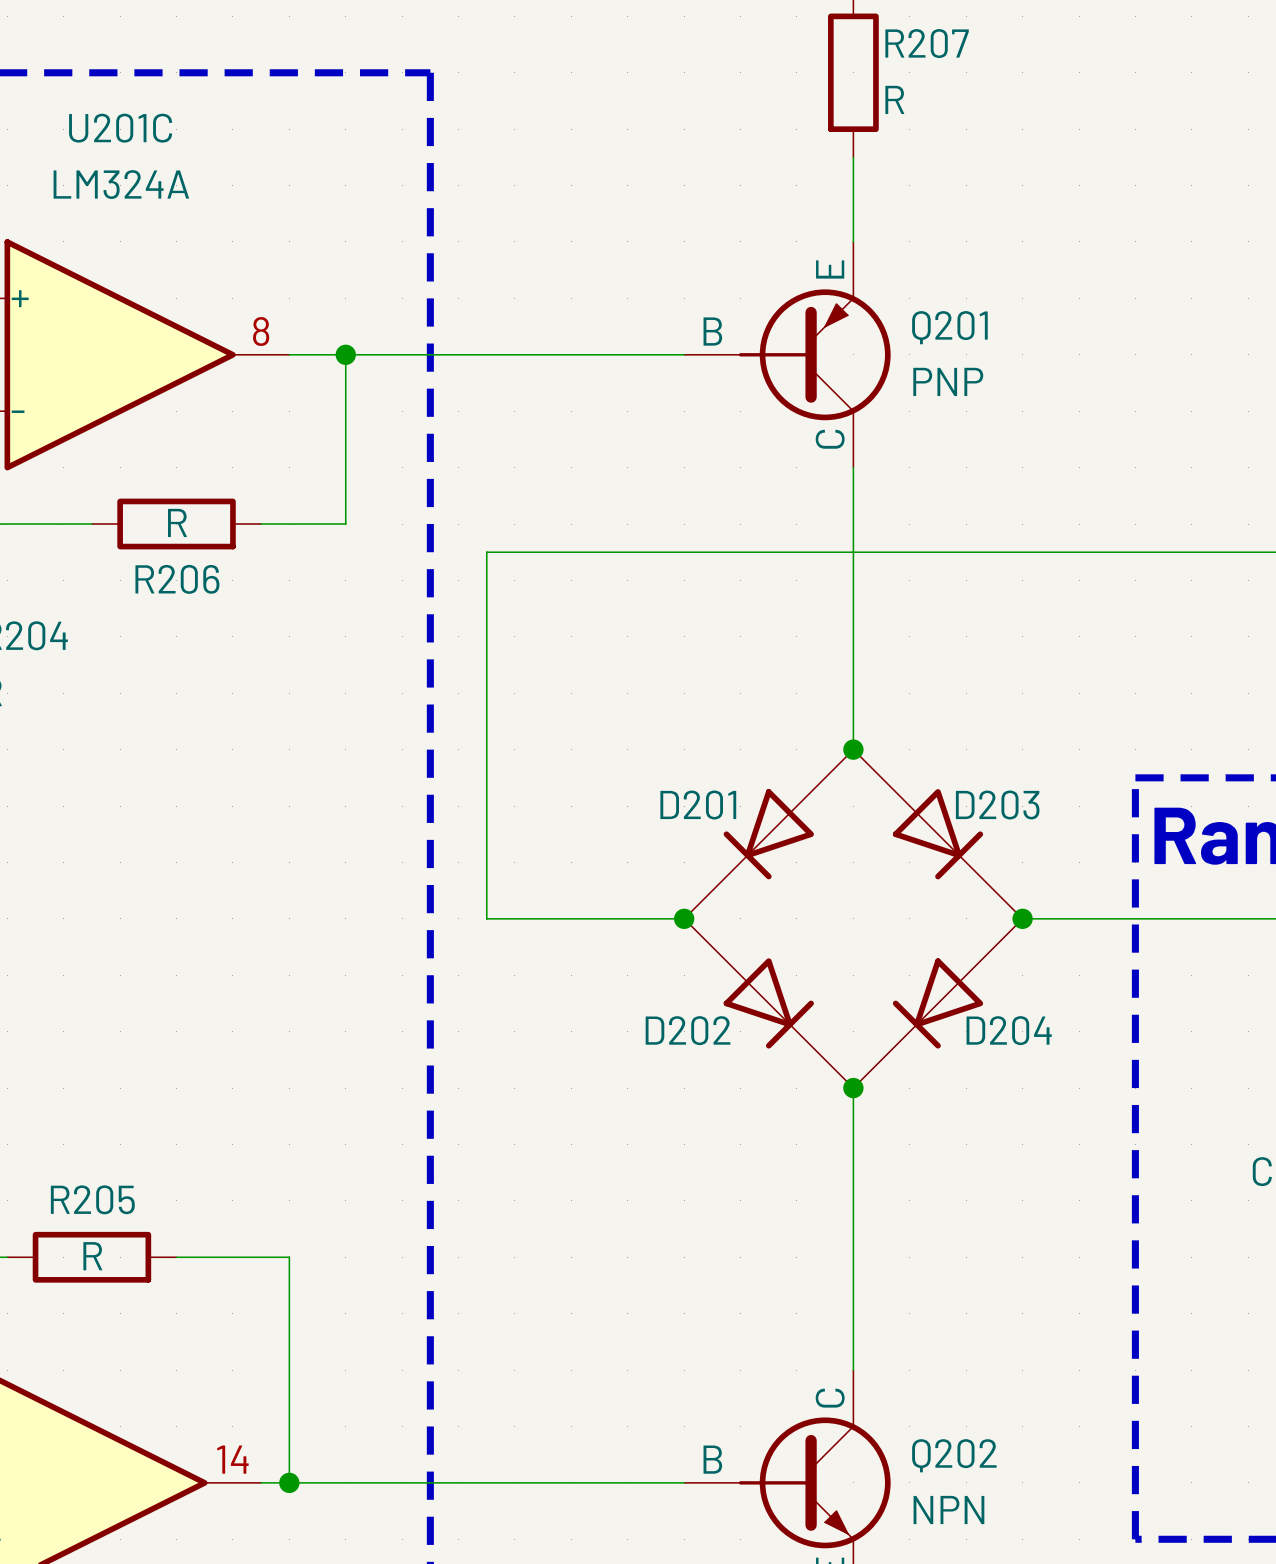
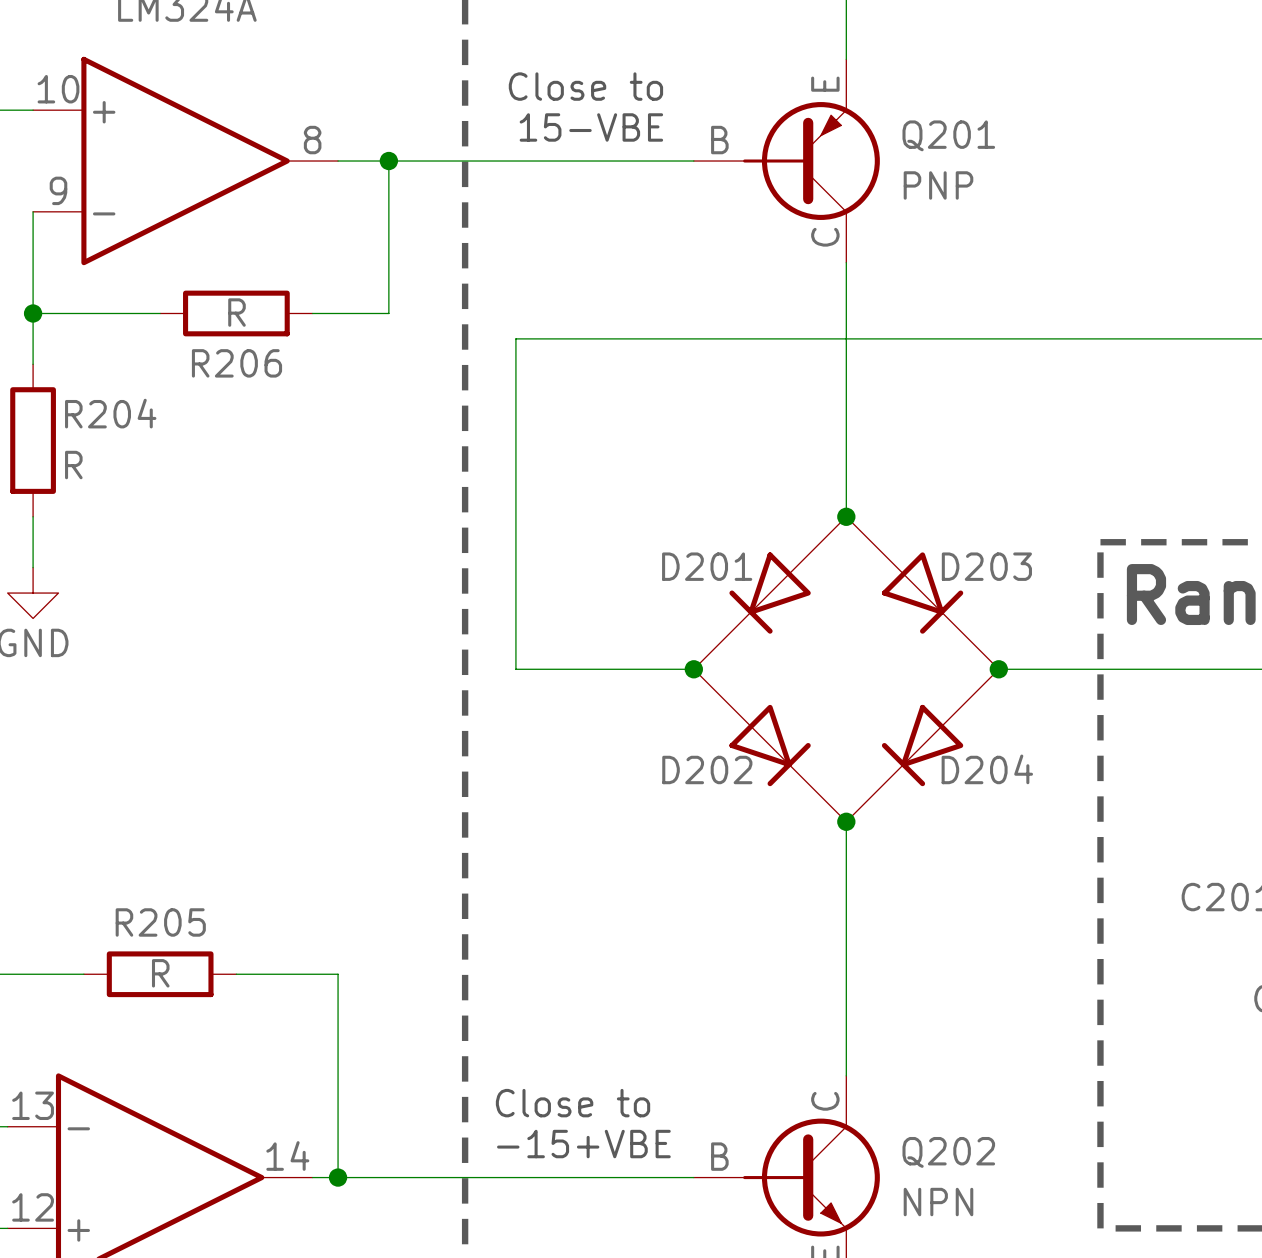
text: none -> Close to (585, 86)
text: none -> 15-VBE (591, 127)
text: none -> Close to (573, 1103)
text: none -> -15+VBE (583, 1144)

